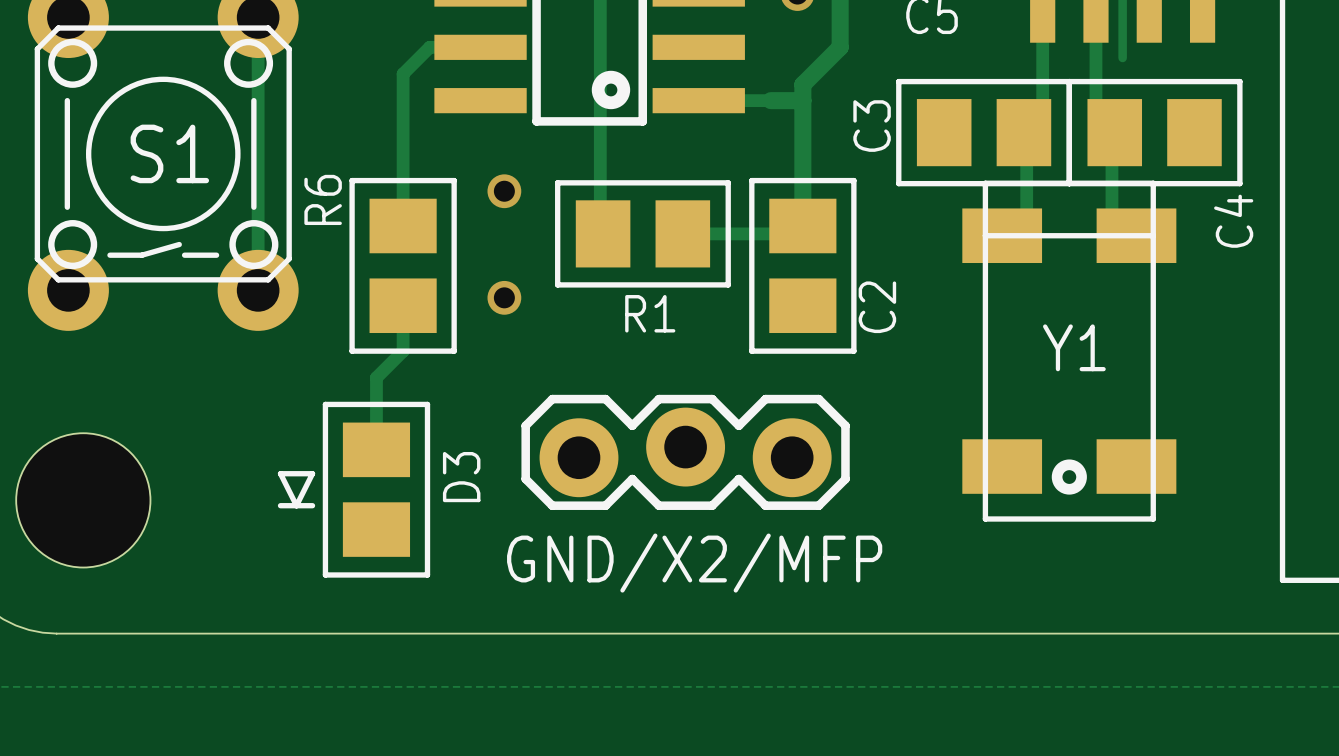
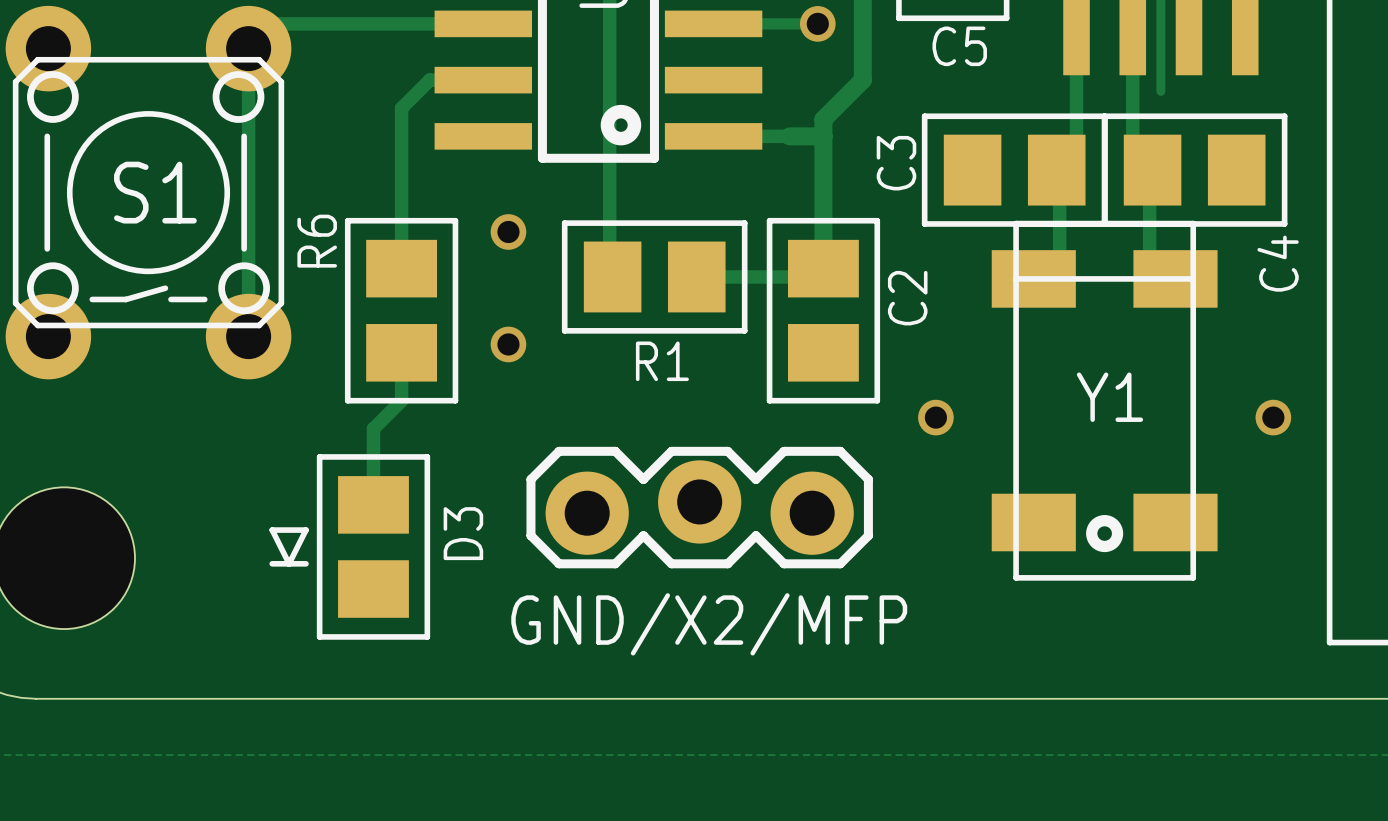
C2 name position: C2 (877, 307) -> C2 (907, 298)
via: none -> (935, 417)
via: none -> (1273, 417)

